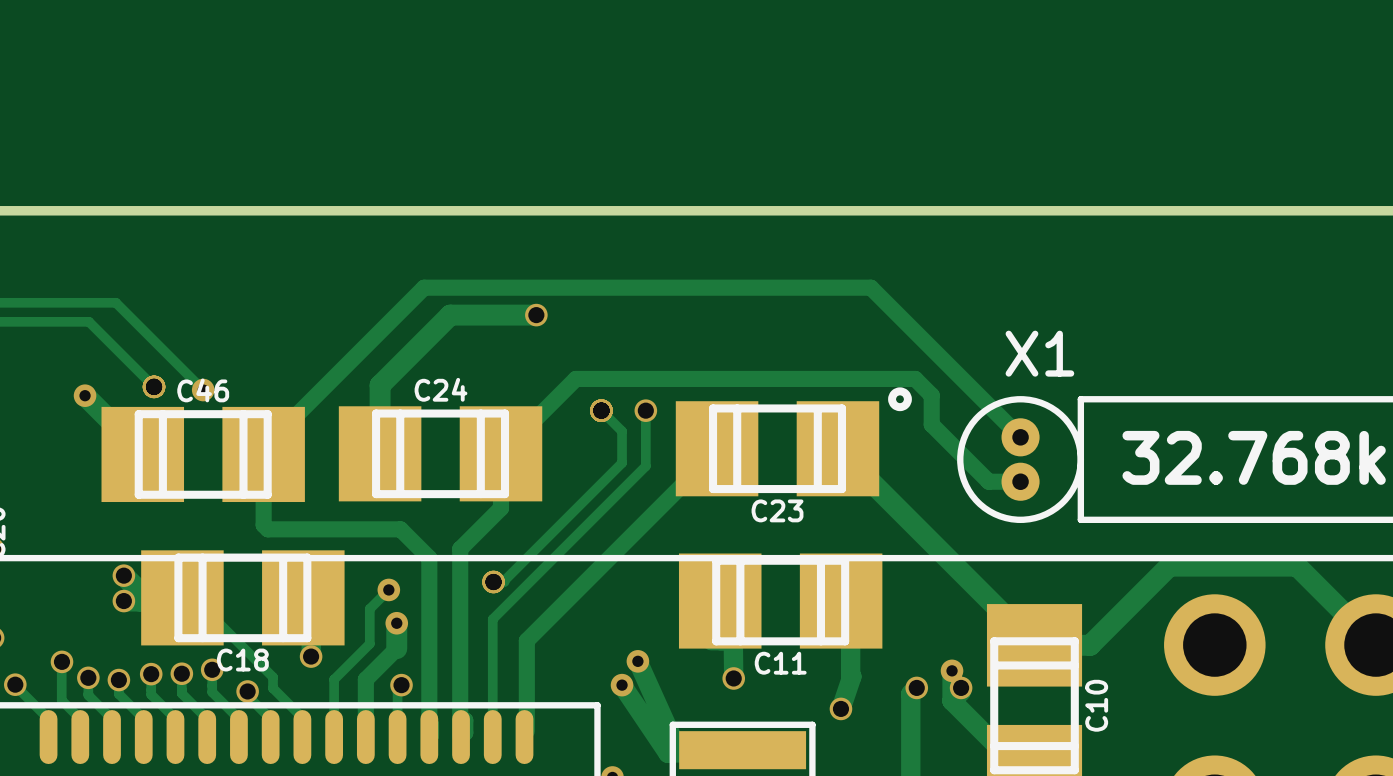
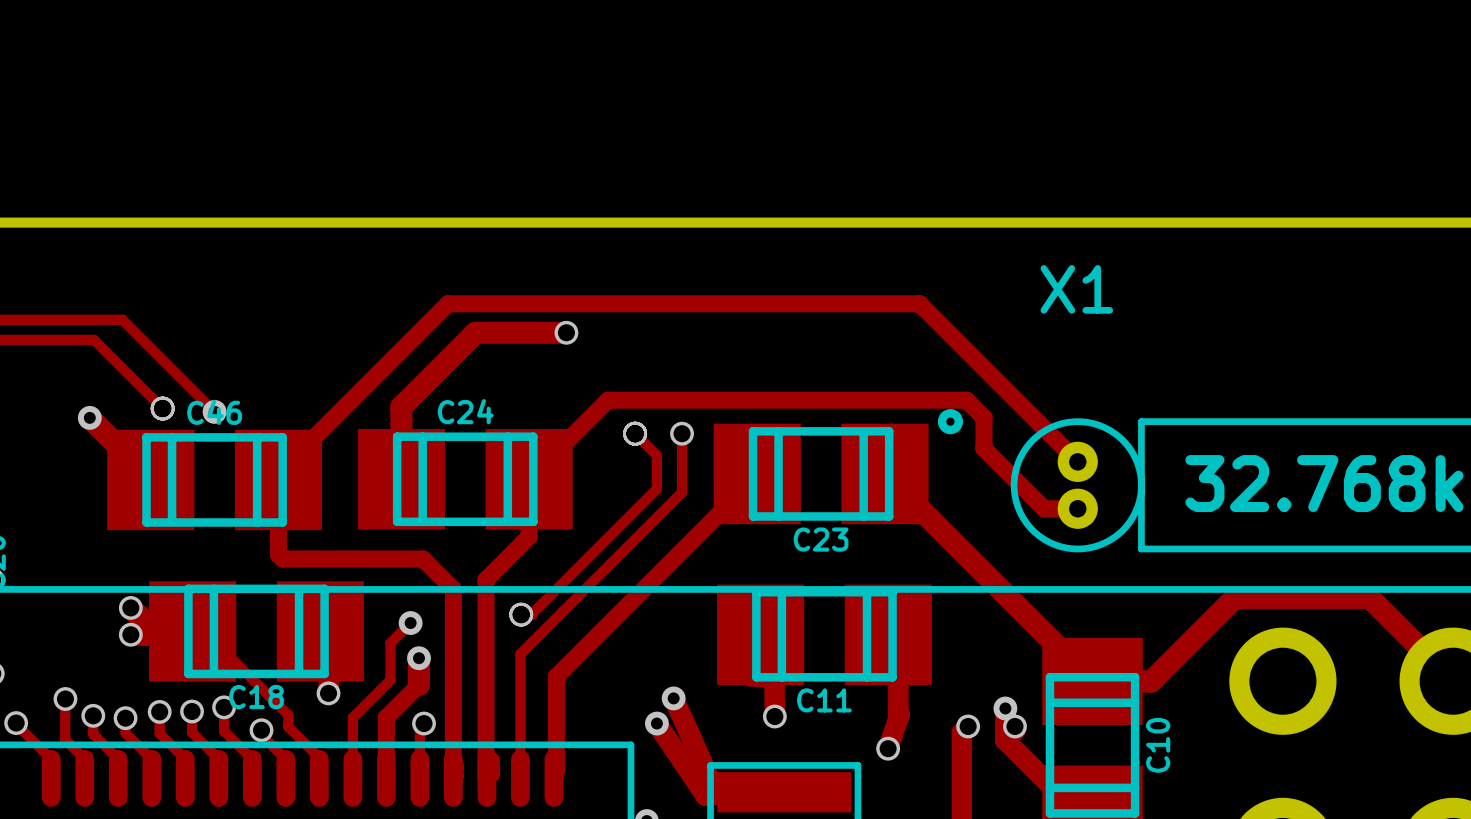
X1 name position: X1 (1039, 353) -> X1 (1076, 289)

